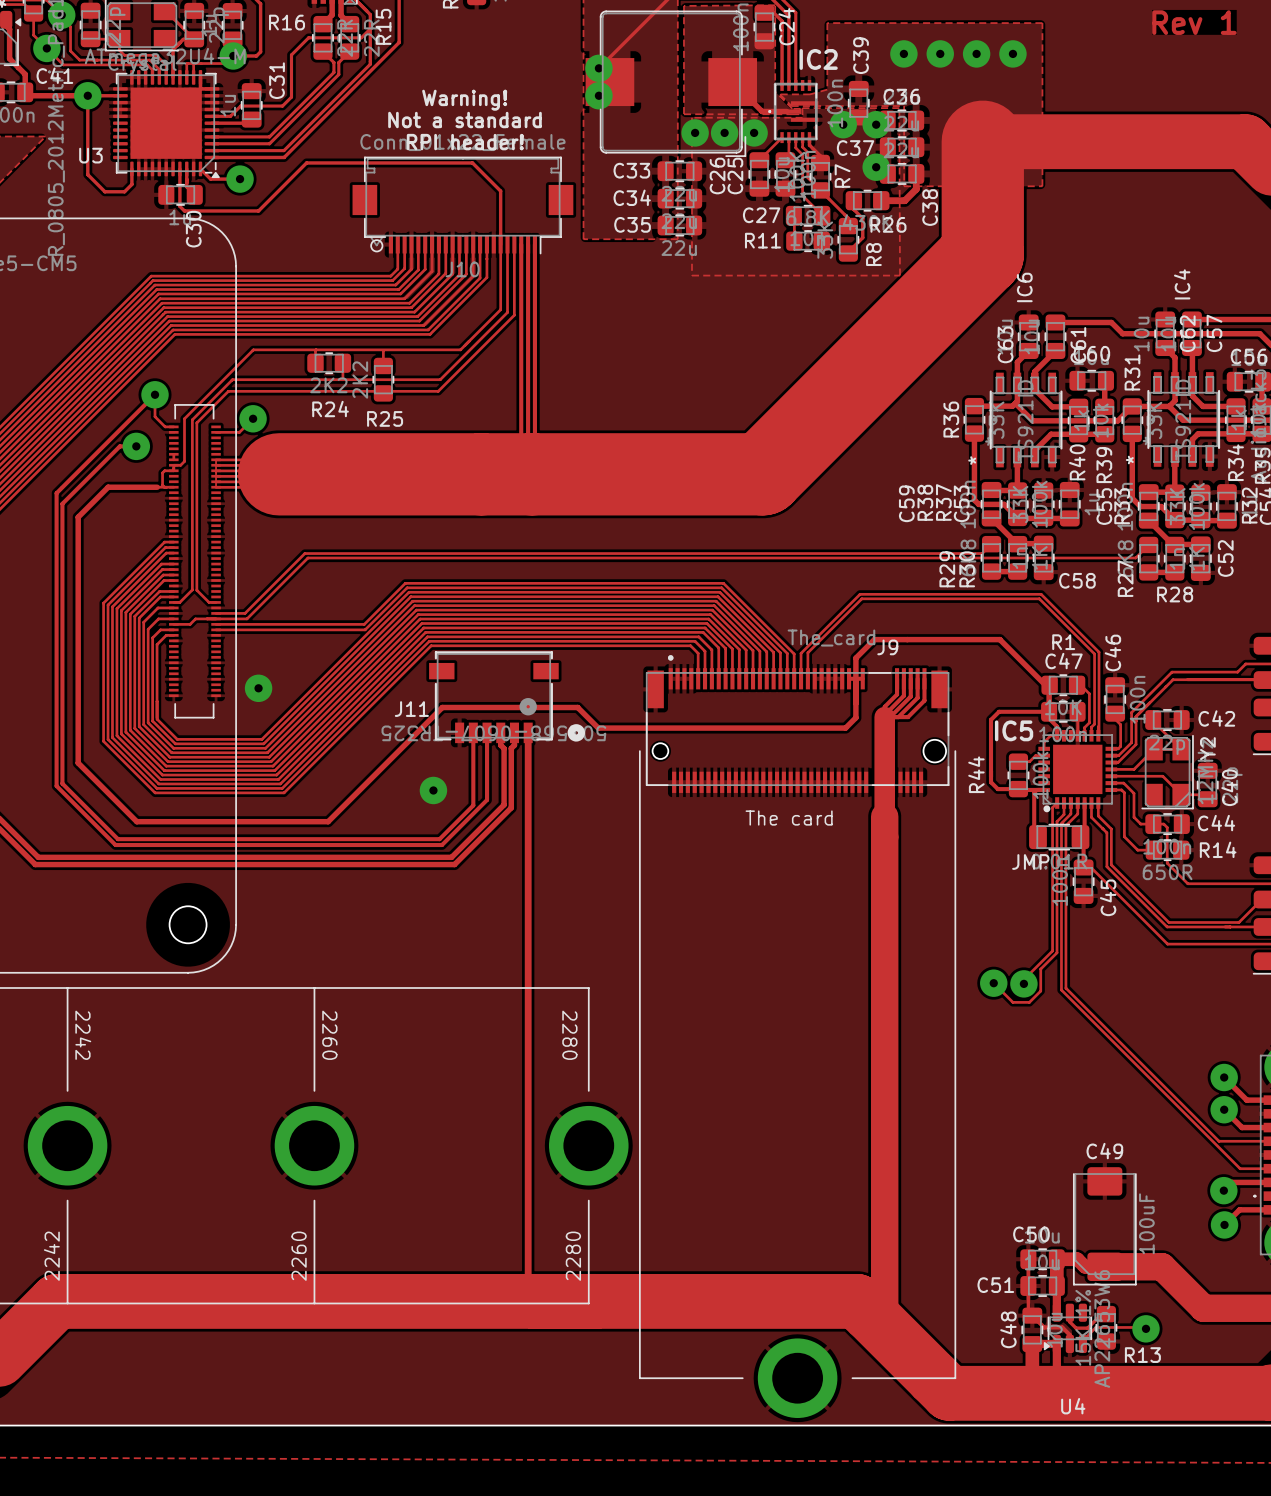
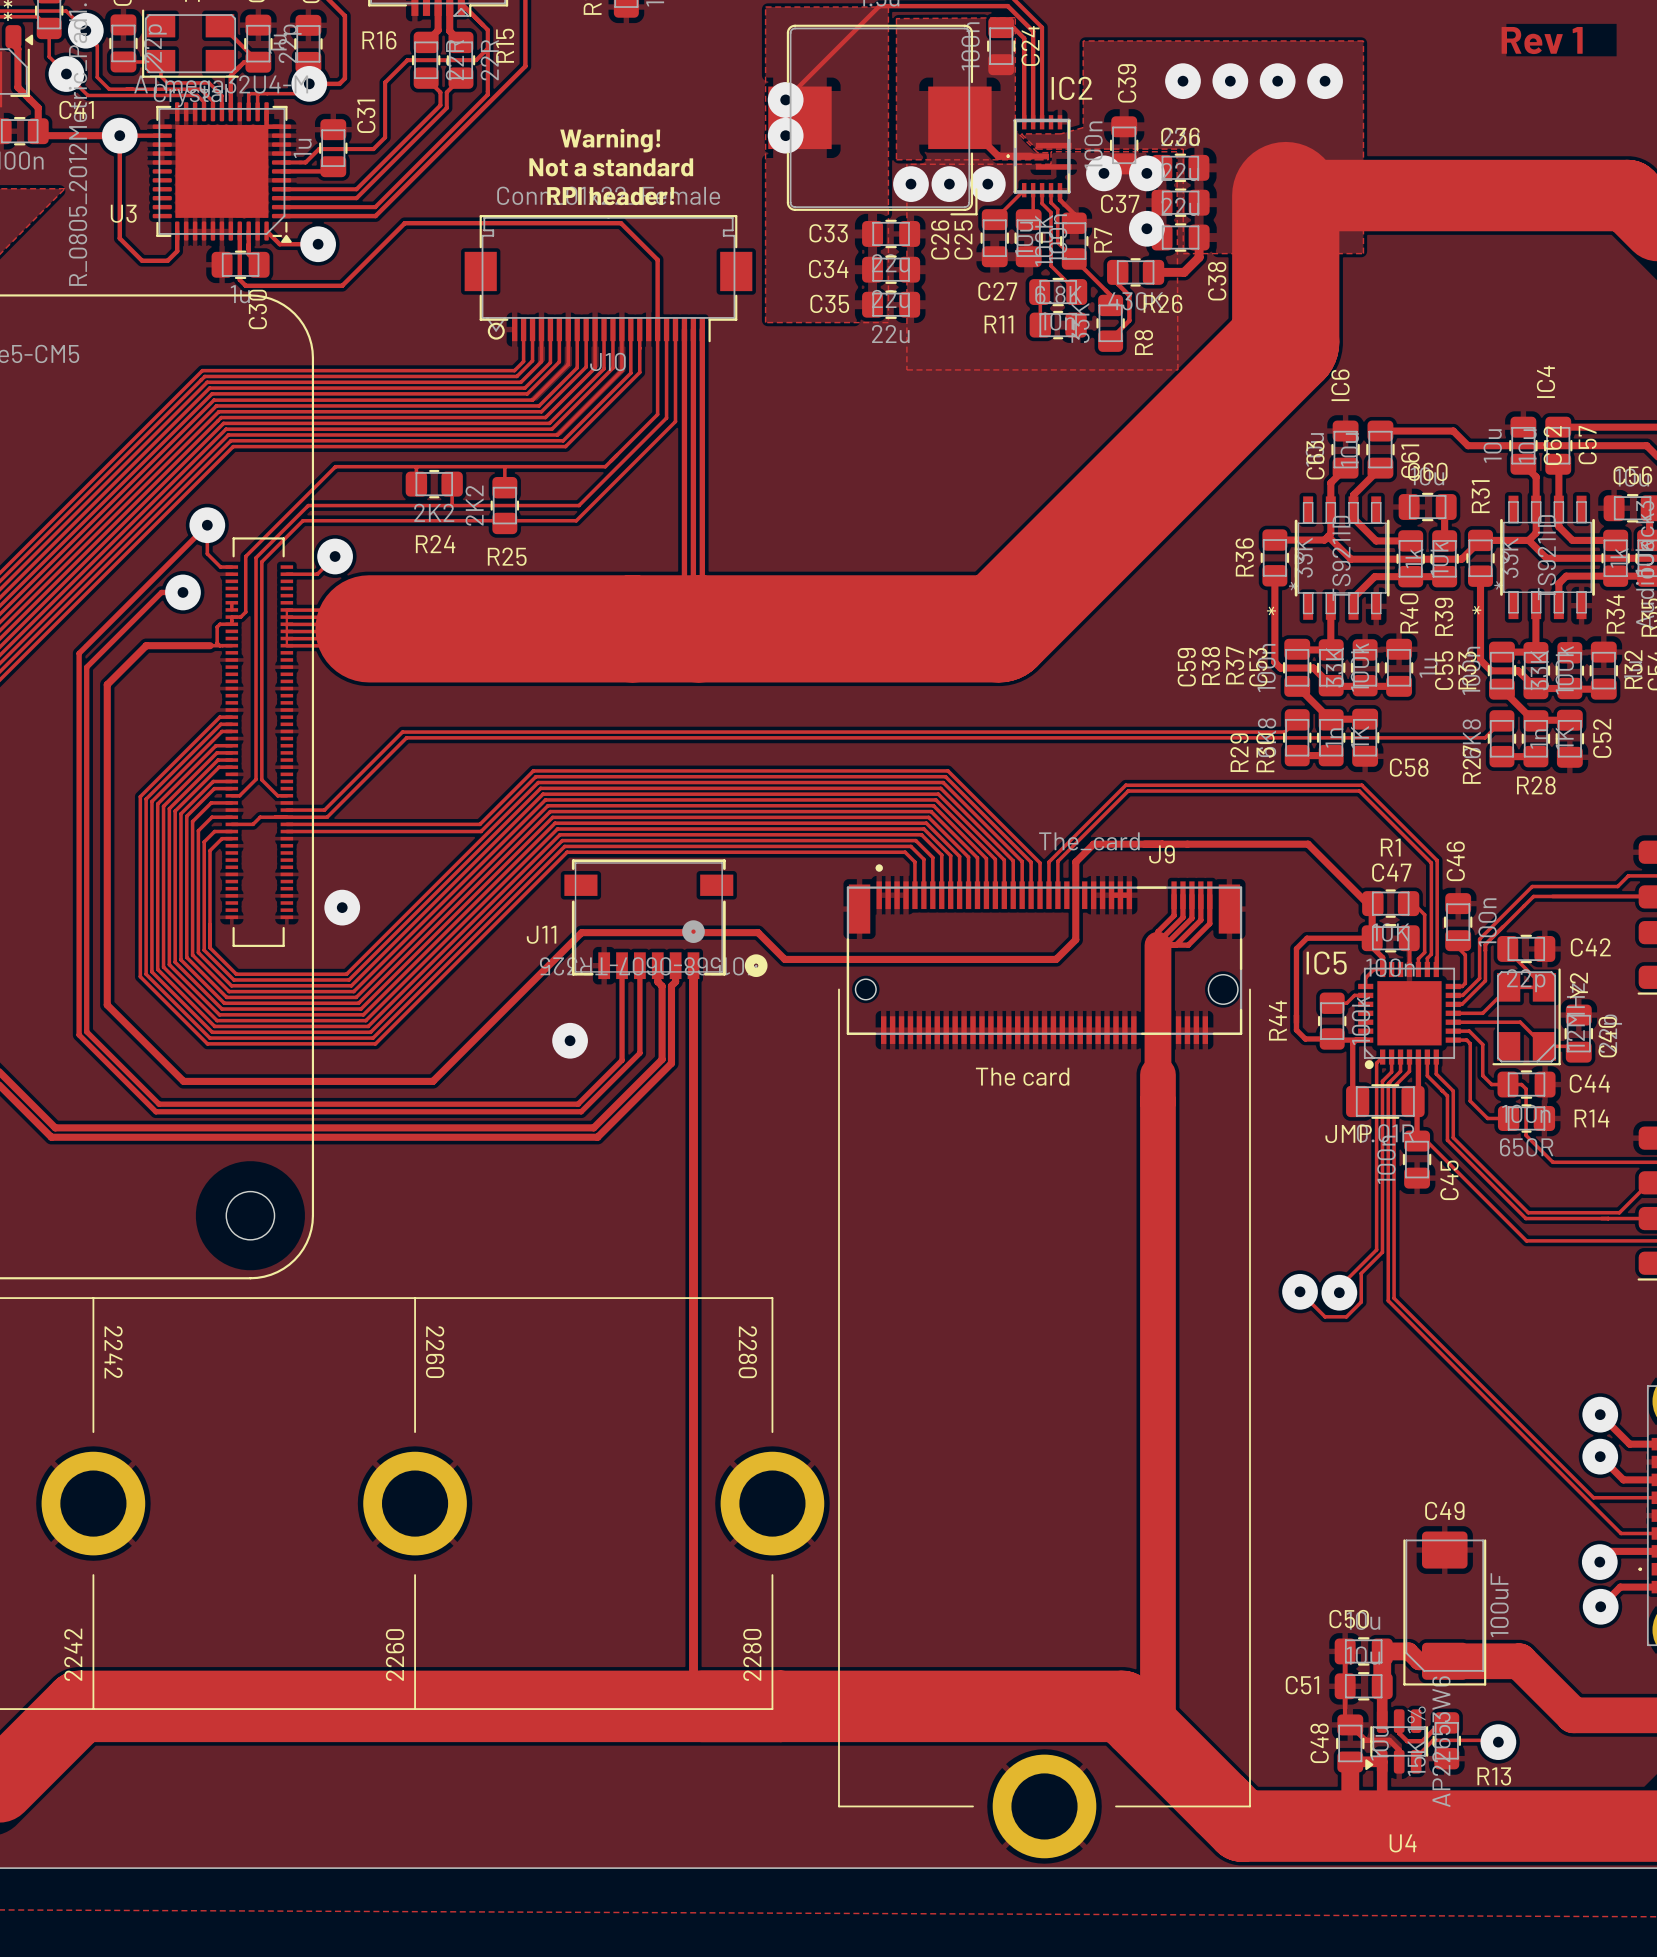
track: (874, 639) (855, 658) (855, 717) (845, 728) (806, 728) -> (1144, 844) (1093, 844) (1075, 862) (1075, 939) (1056, 959)

